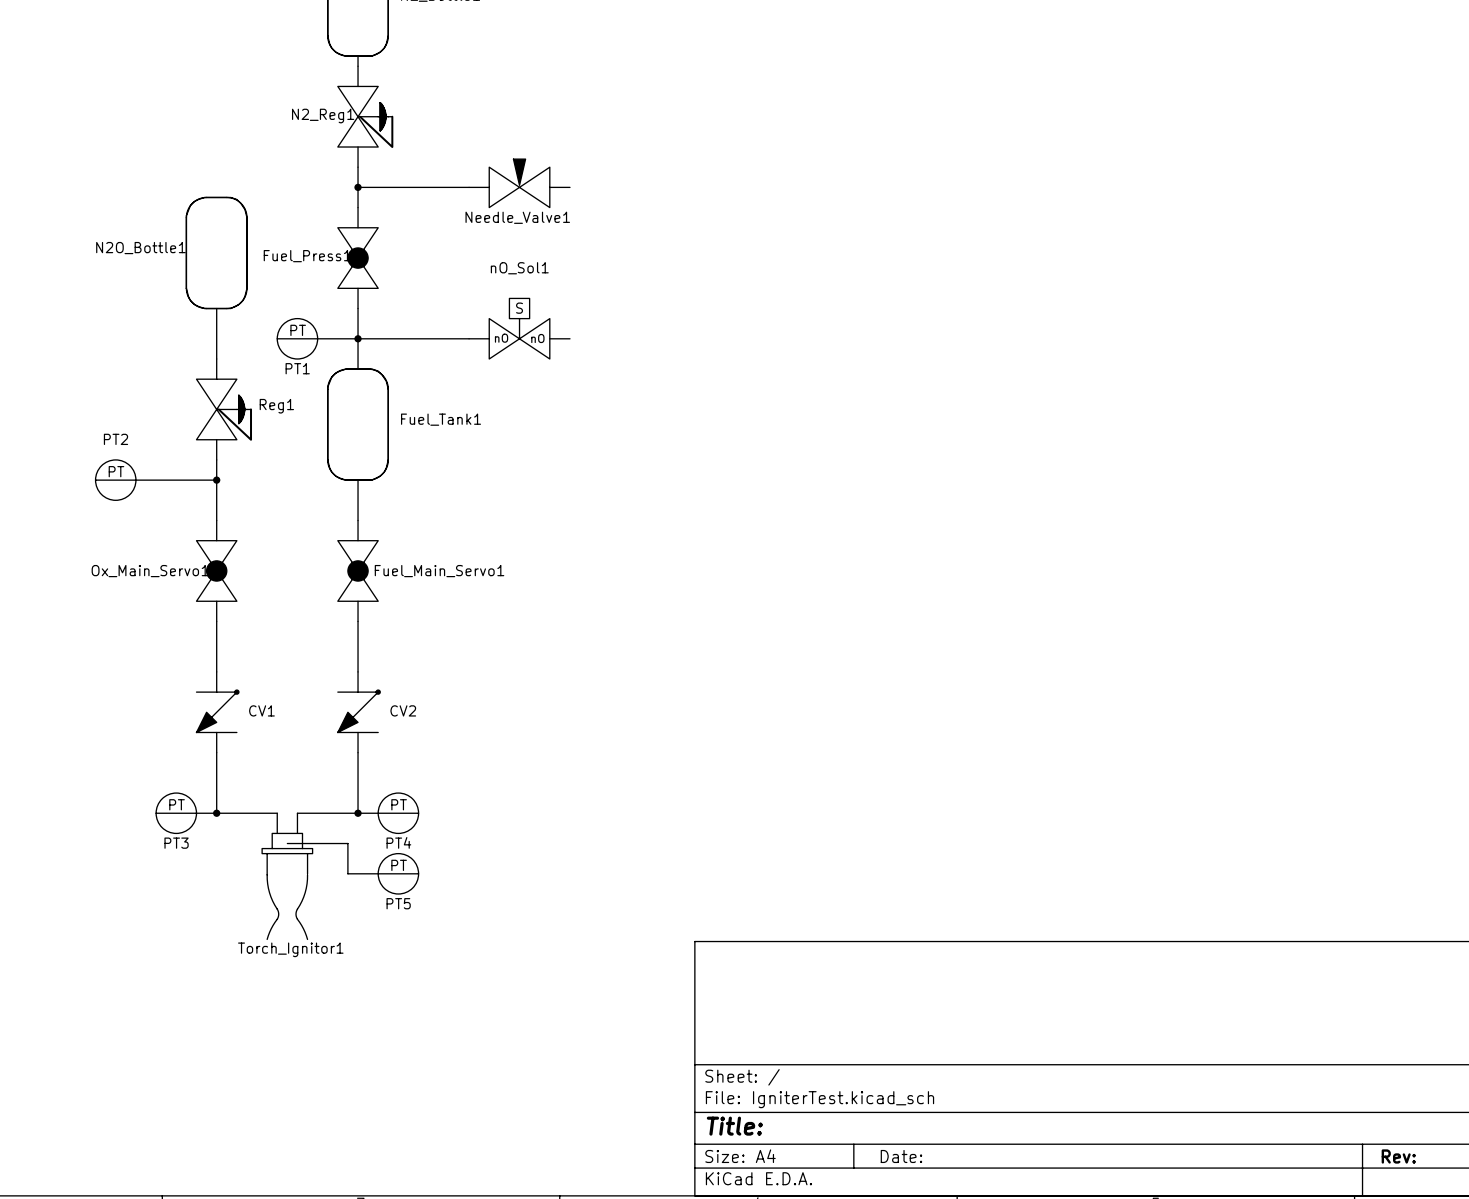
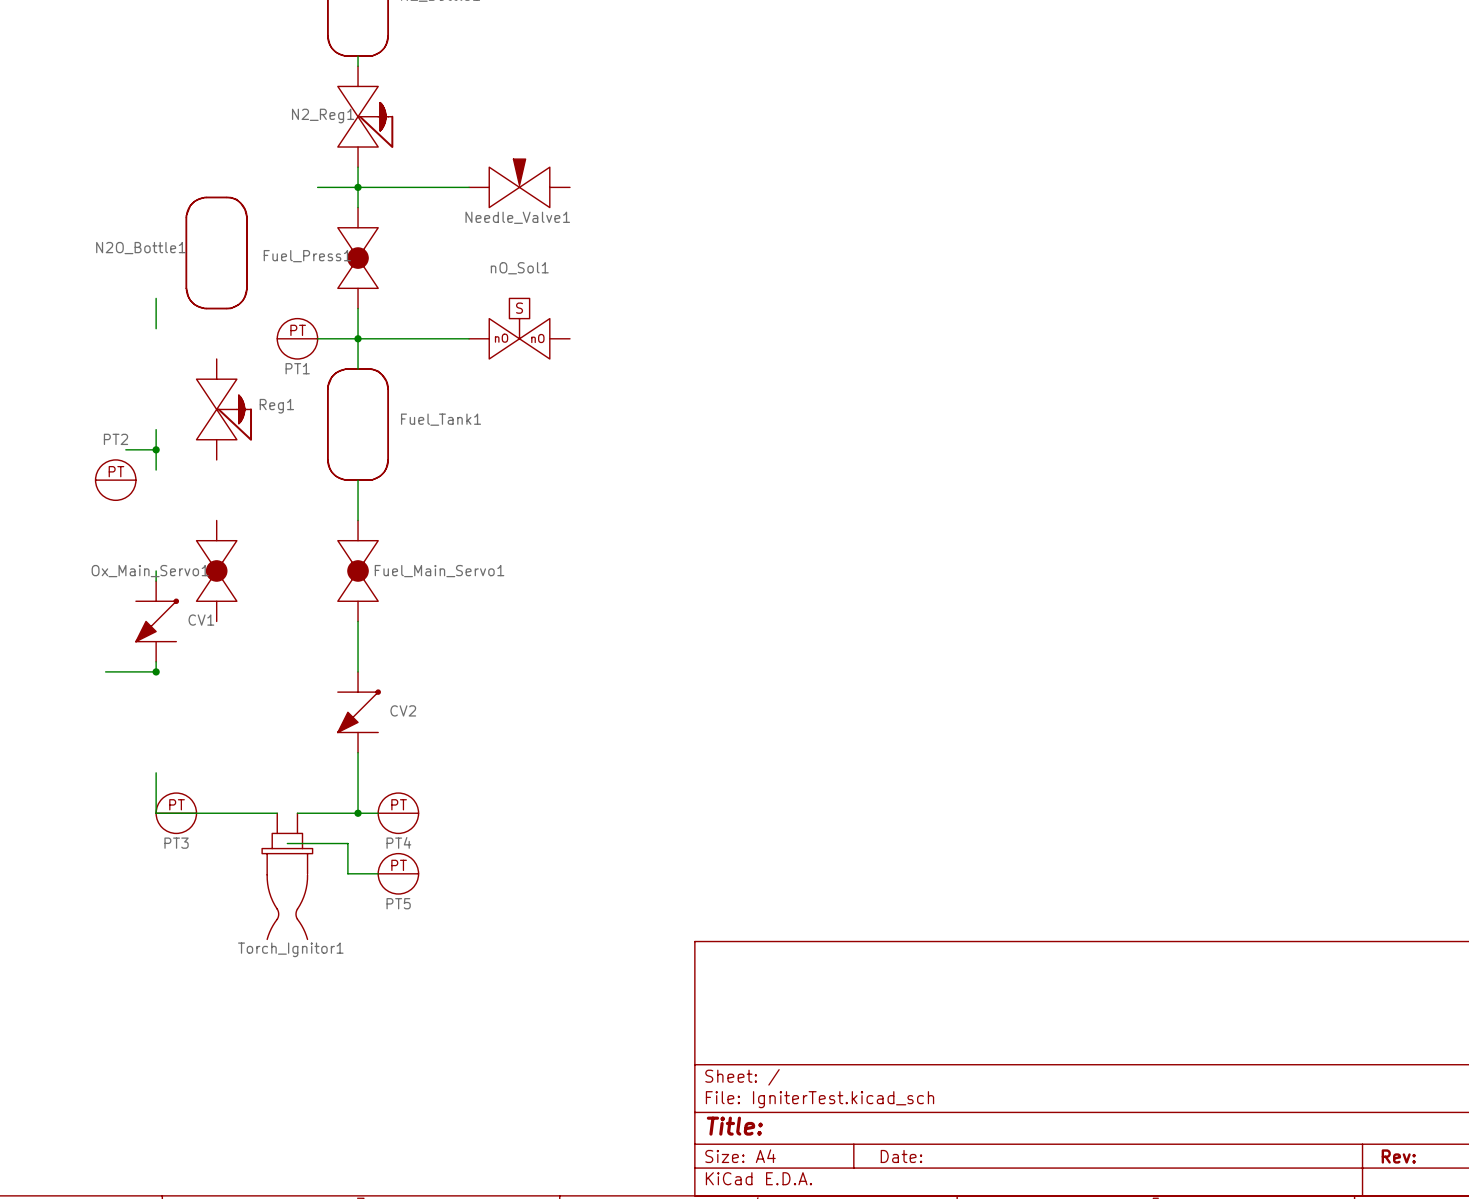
wire: none -> (317, 187) (358, 187)
wire: none -> (156, 298) (156, 328)
wire: (216, 308) (216, 358) -> none
wire: none -> (156, 429) (156, 470)
wire: none -> (125, 449) (156, 449)
junction: none -> (156, 449)
wire: (216, 459) (216, 520) -> none
wire: (135, 480) (216, 480) -> none
junction: (216, 480) -> none
wire: none -> (156, 570) (156, 581)
wire: (216, 621) (216, 671) -> none
wire: none -> (156, 661) (156, 671) (105, 671)
junction: none -> (156, 671)
CV1 position: (217, 712) -> (157, 621)
wire: (216, 752) (216, 813) -> none
wire: none -> (156, 772) (156, 813) (196, 813)
junction: (216, 813) -> none

